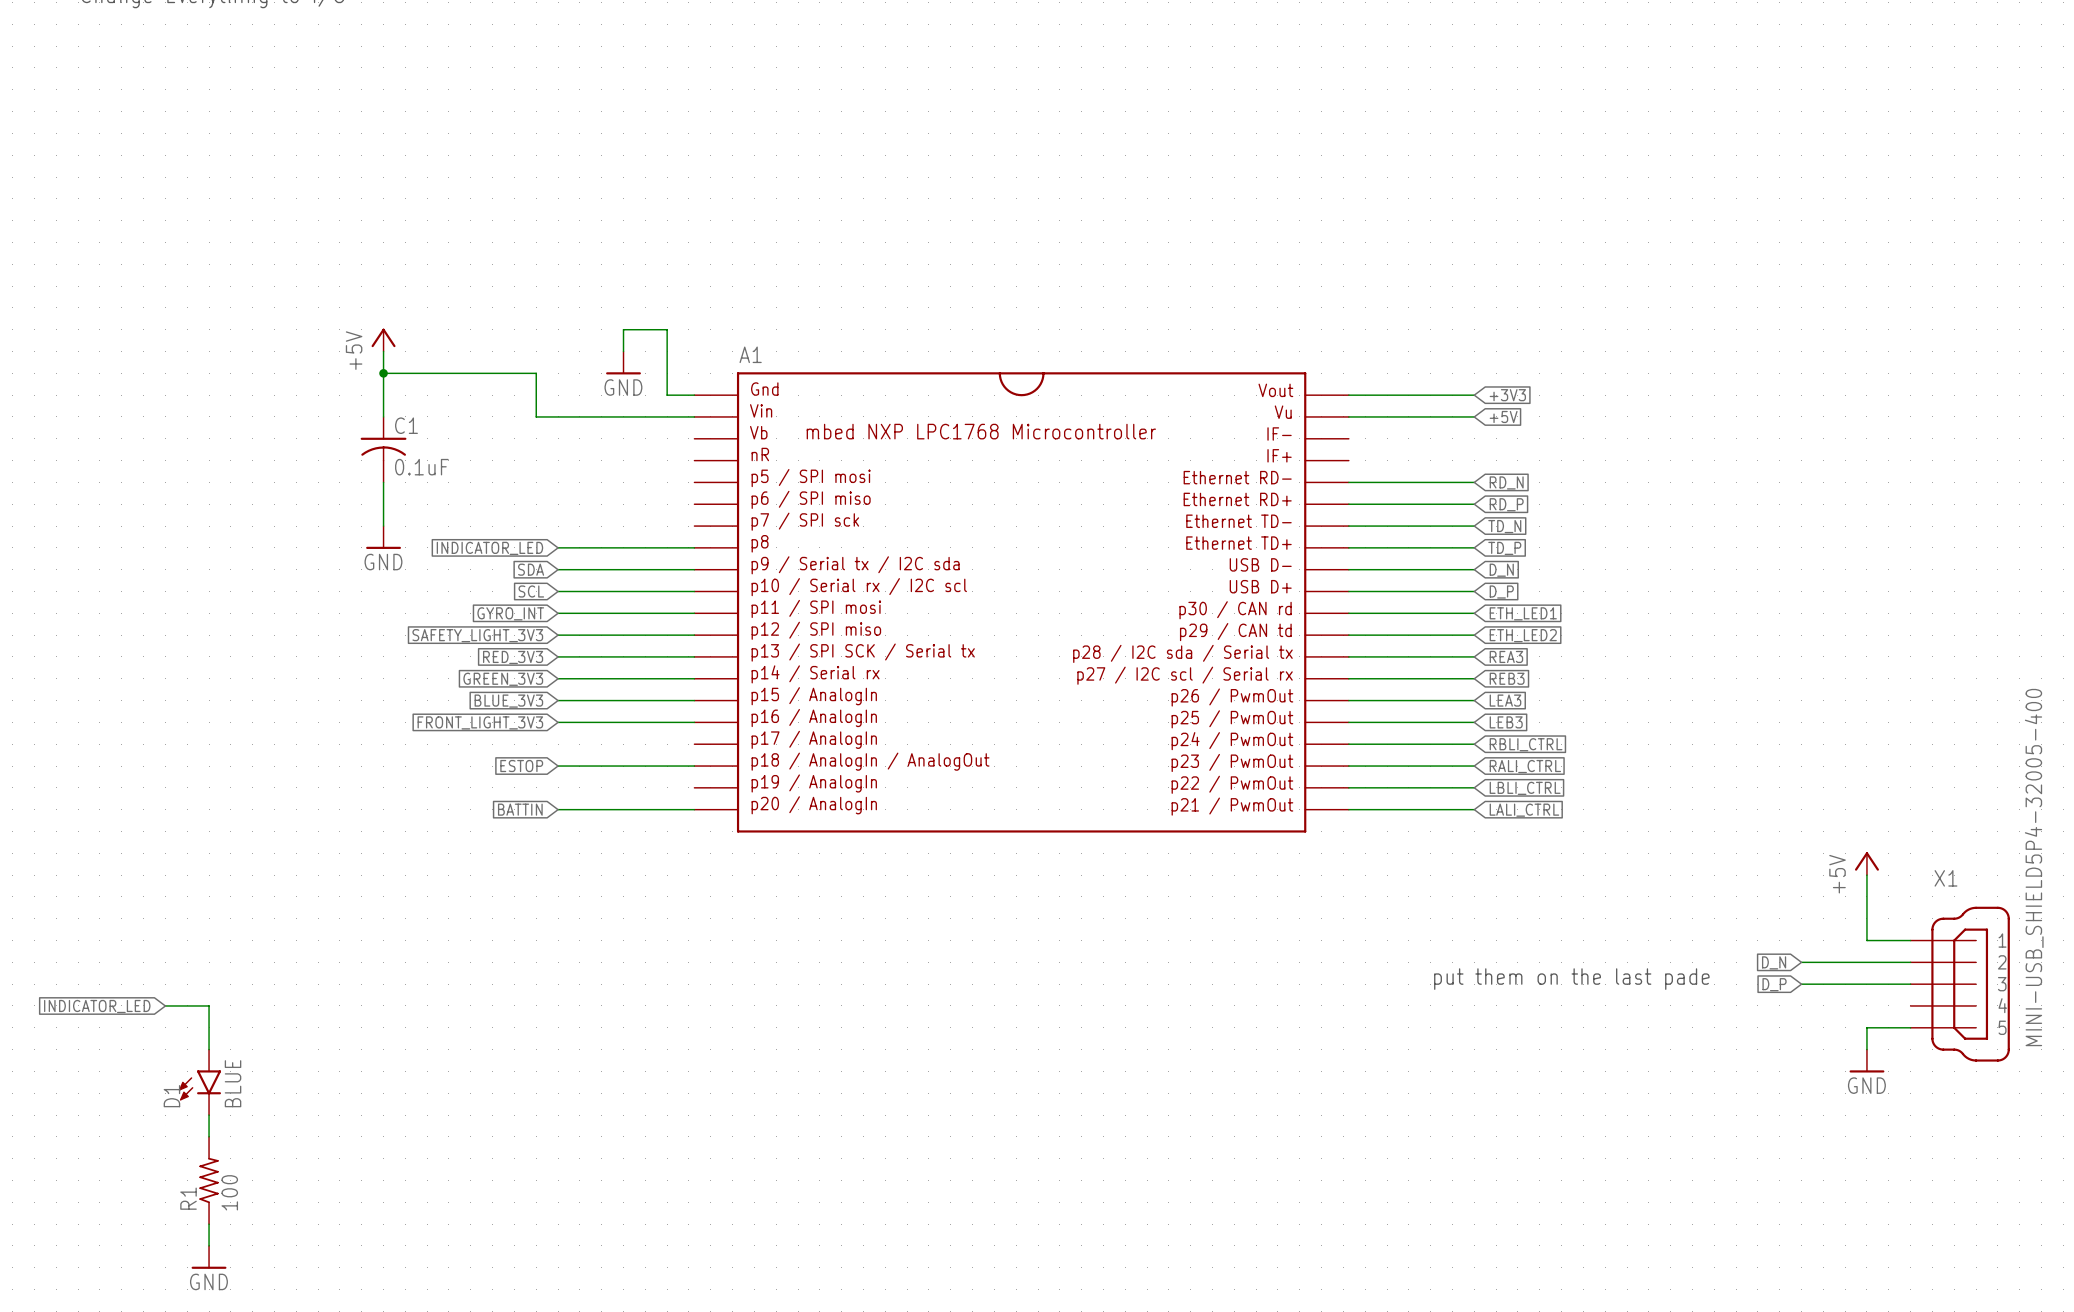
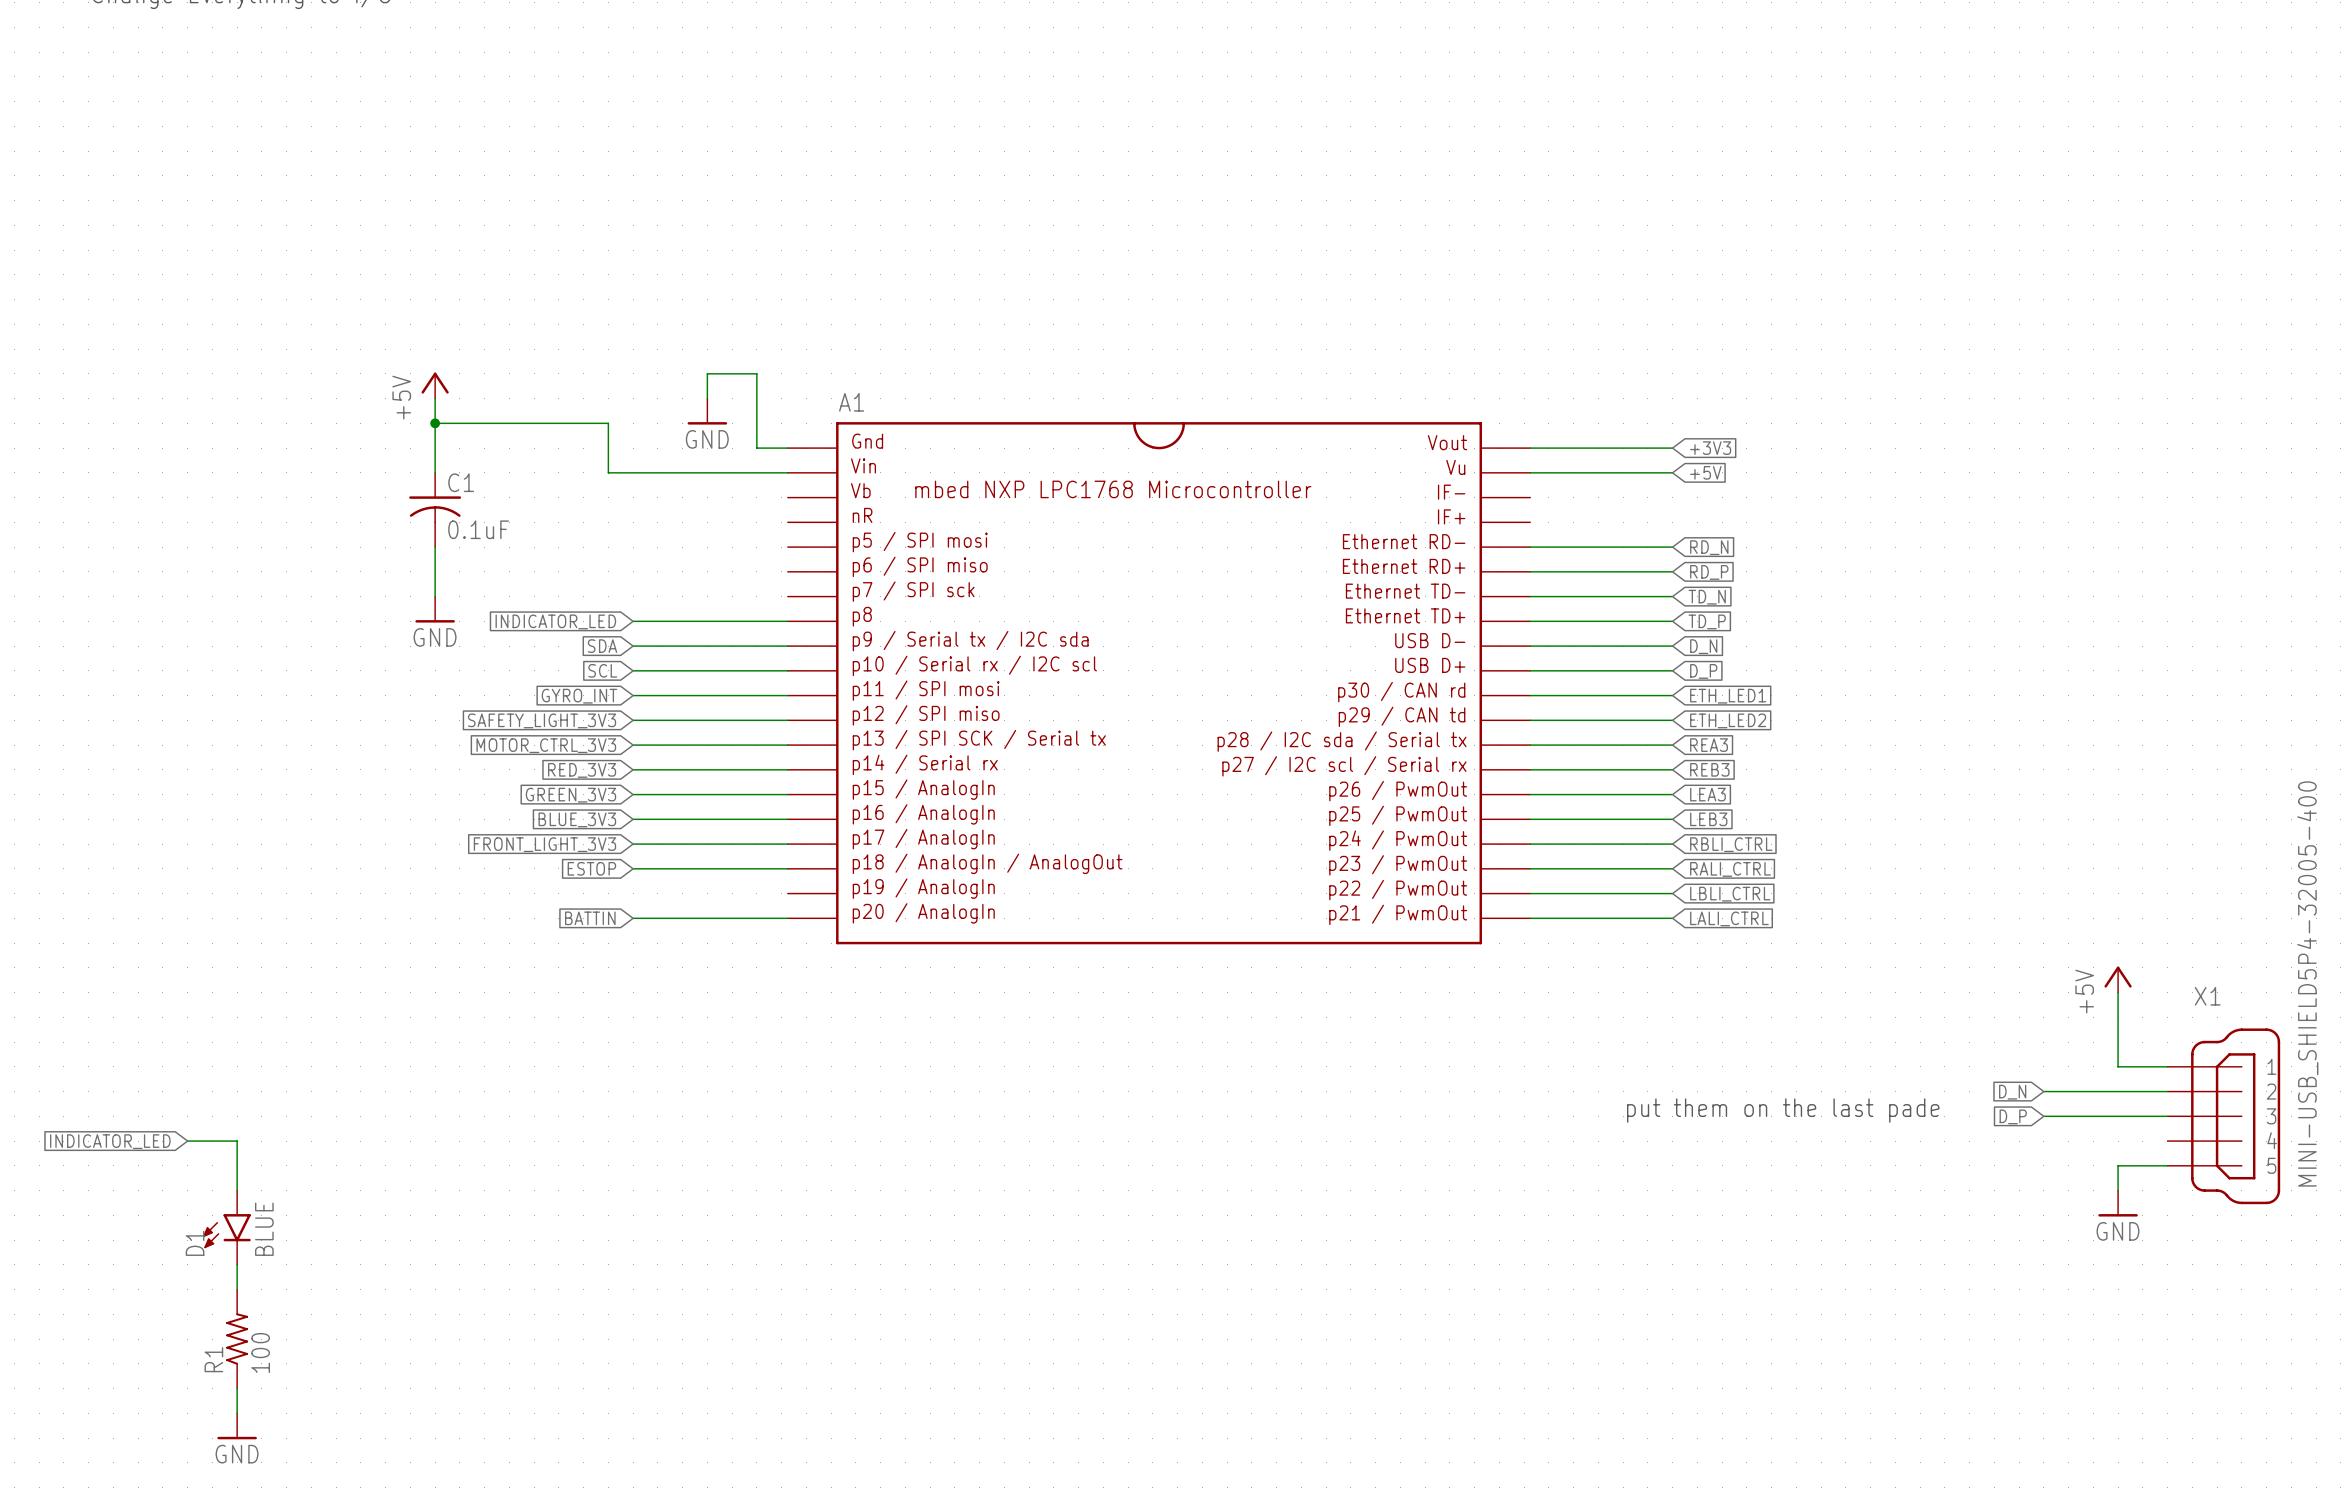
global label: RED_3V3 (513, 657) -> MOTOR_CTRL_3V3 (546, 745)
global label: GREEN_3V3 (503, 679) -> RED_3V3 (582, 770)
global label: BLUE_3V3 (508, 701) -> GREEN_3V3 (570, 795)
global label: FRONT_LIGHT_3V3 (480, 722) -> BLUE_3V3 (577, 819)
global label: none -> FRONT_LIGHT_3V3 (544, 844)
wire: none -> (633, 844) (787, 844)

